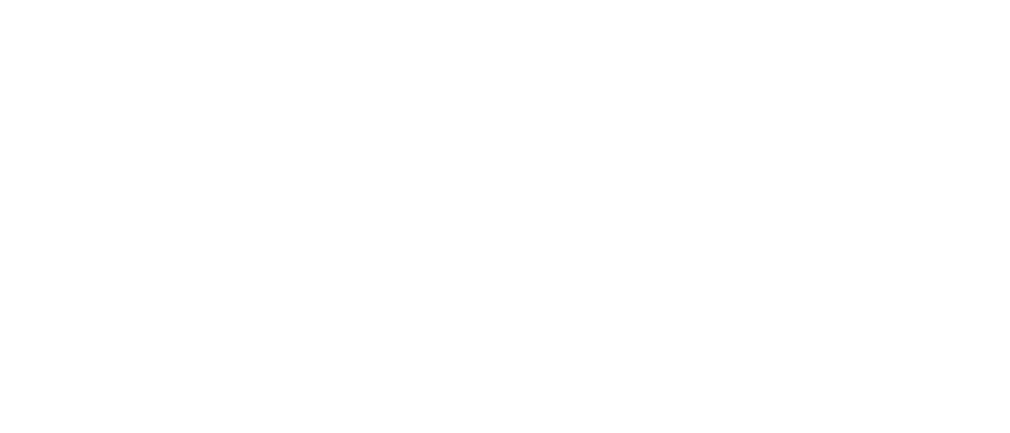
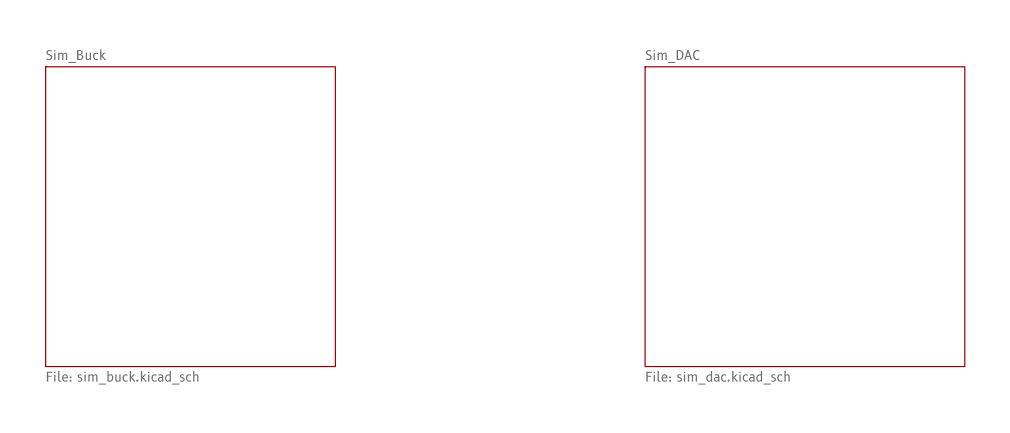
sheet Sim_Buck: none -> File: sim_buck.kicad_sch (190, 216)
sheet Sim_DAC: none -> File: sim_dac.kicad_sch (804, 216)

